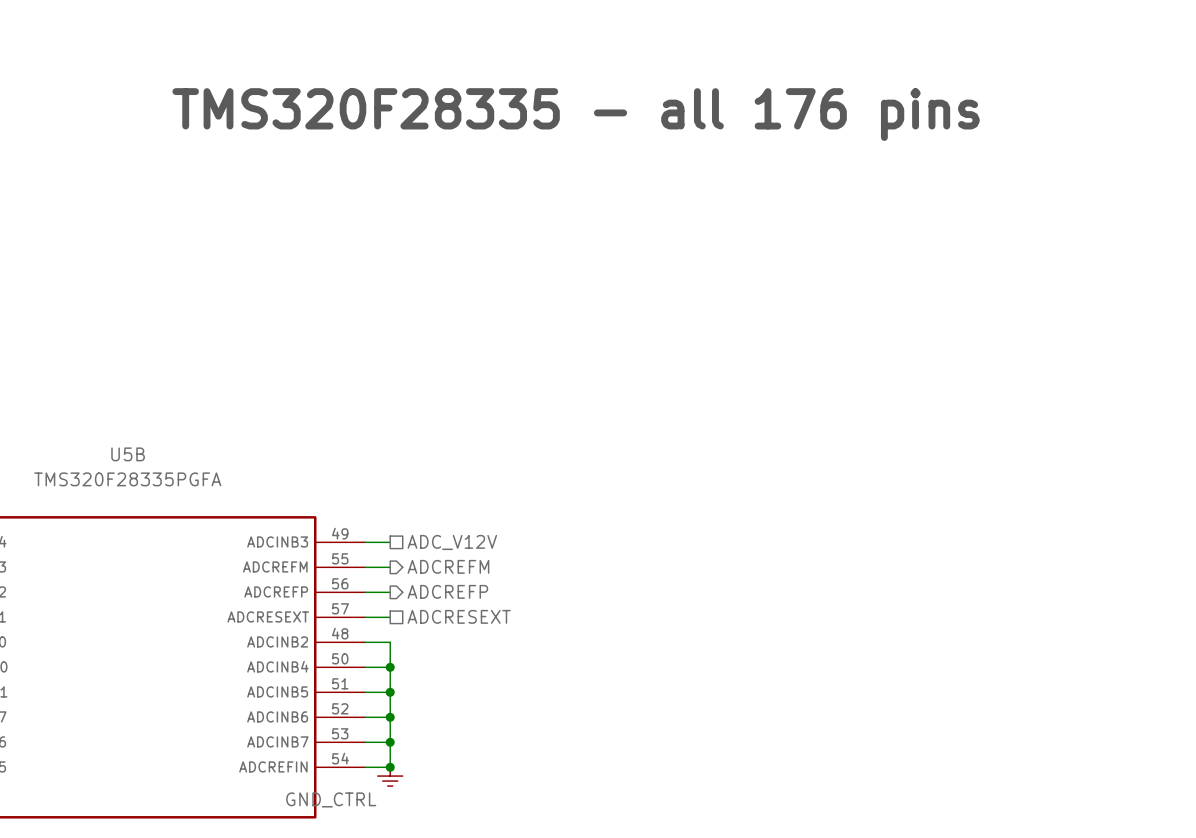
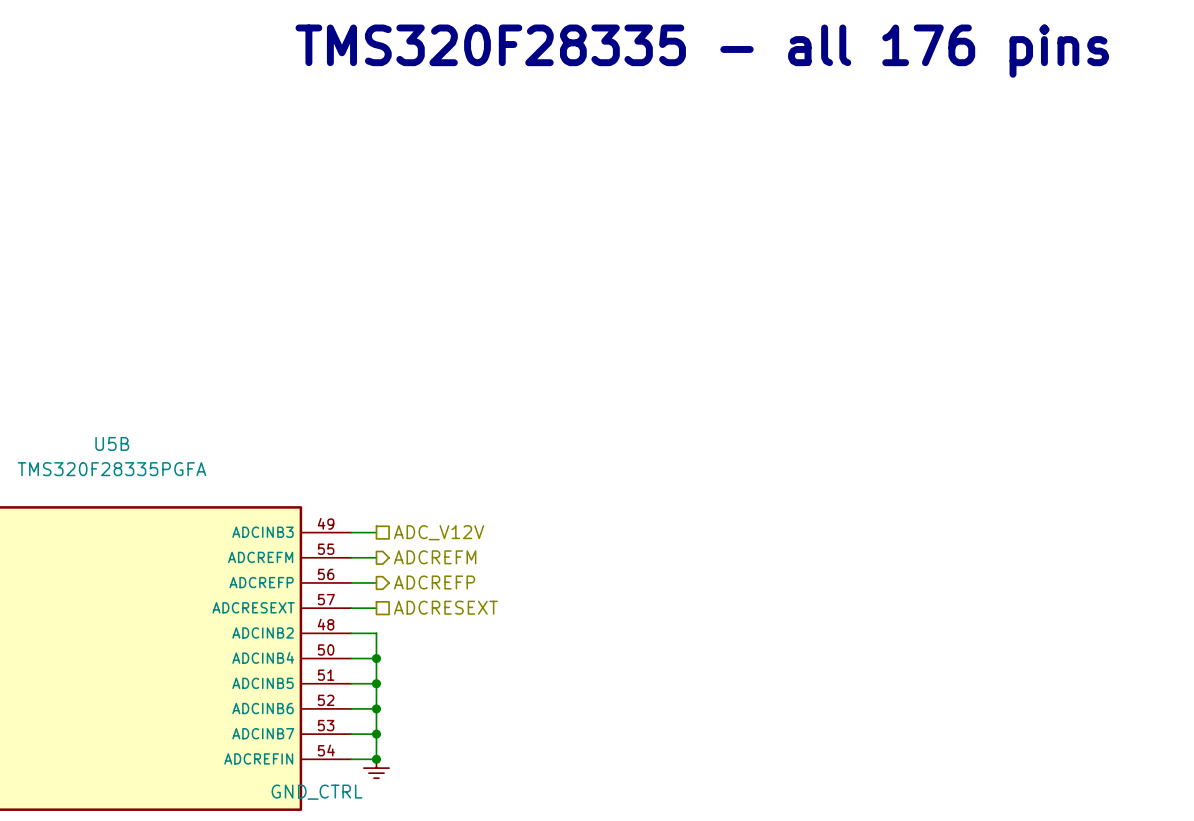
text position: TMS320F28335 - all 176 pins (576, 114) -> TMS320F28335 - all 176 pins (702, 51)

